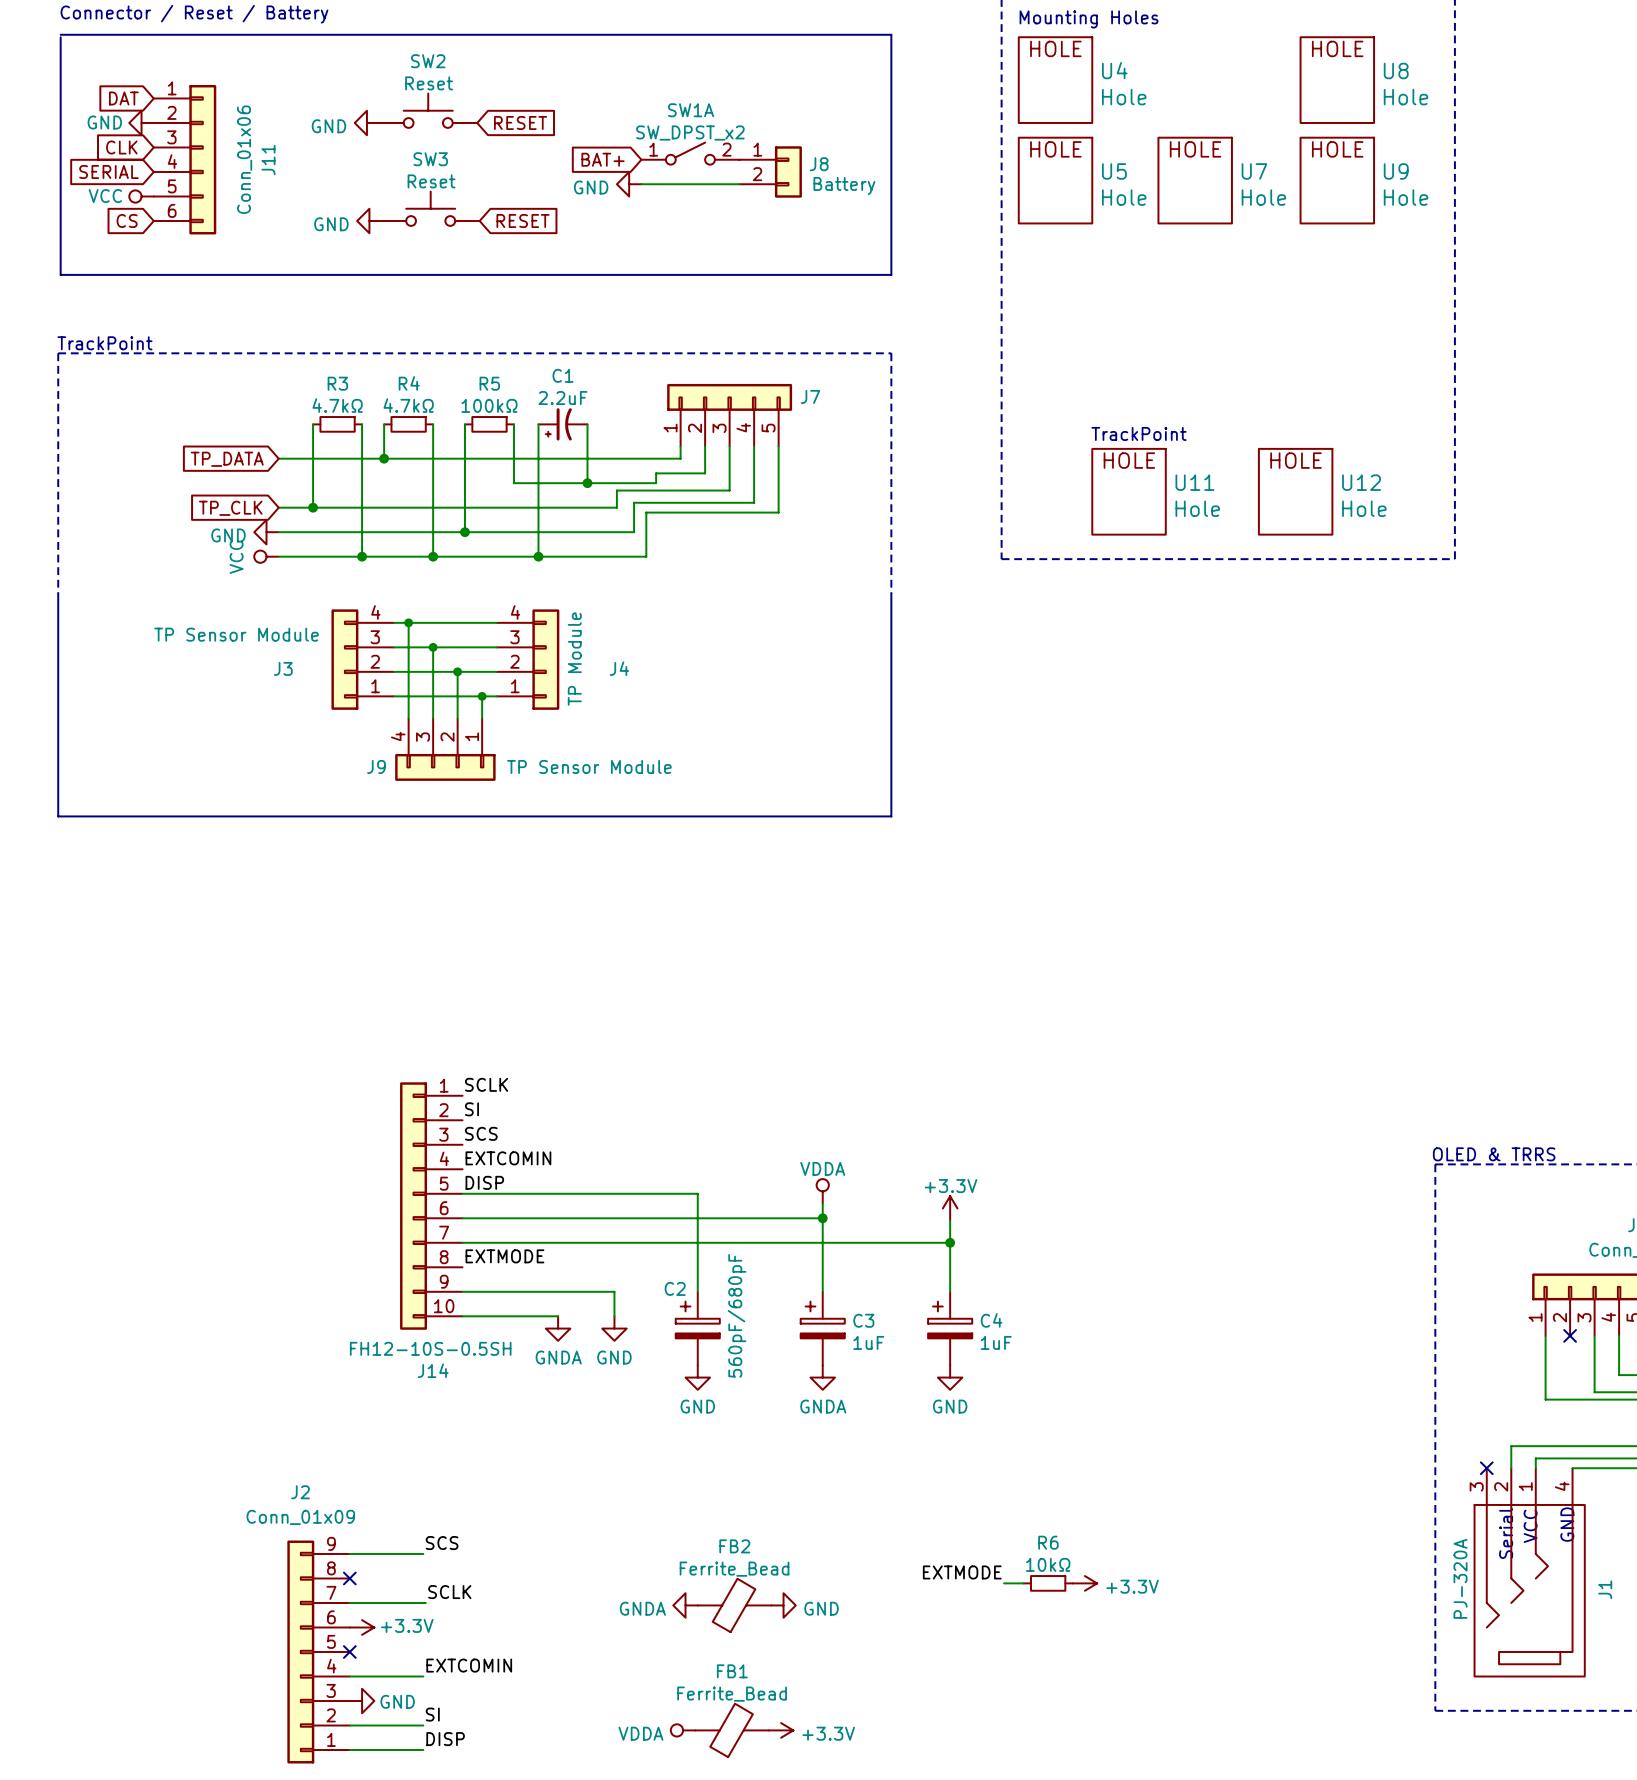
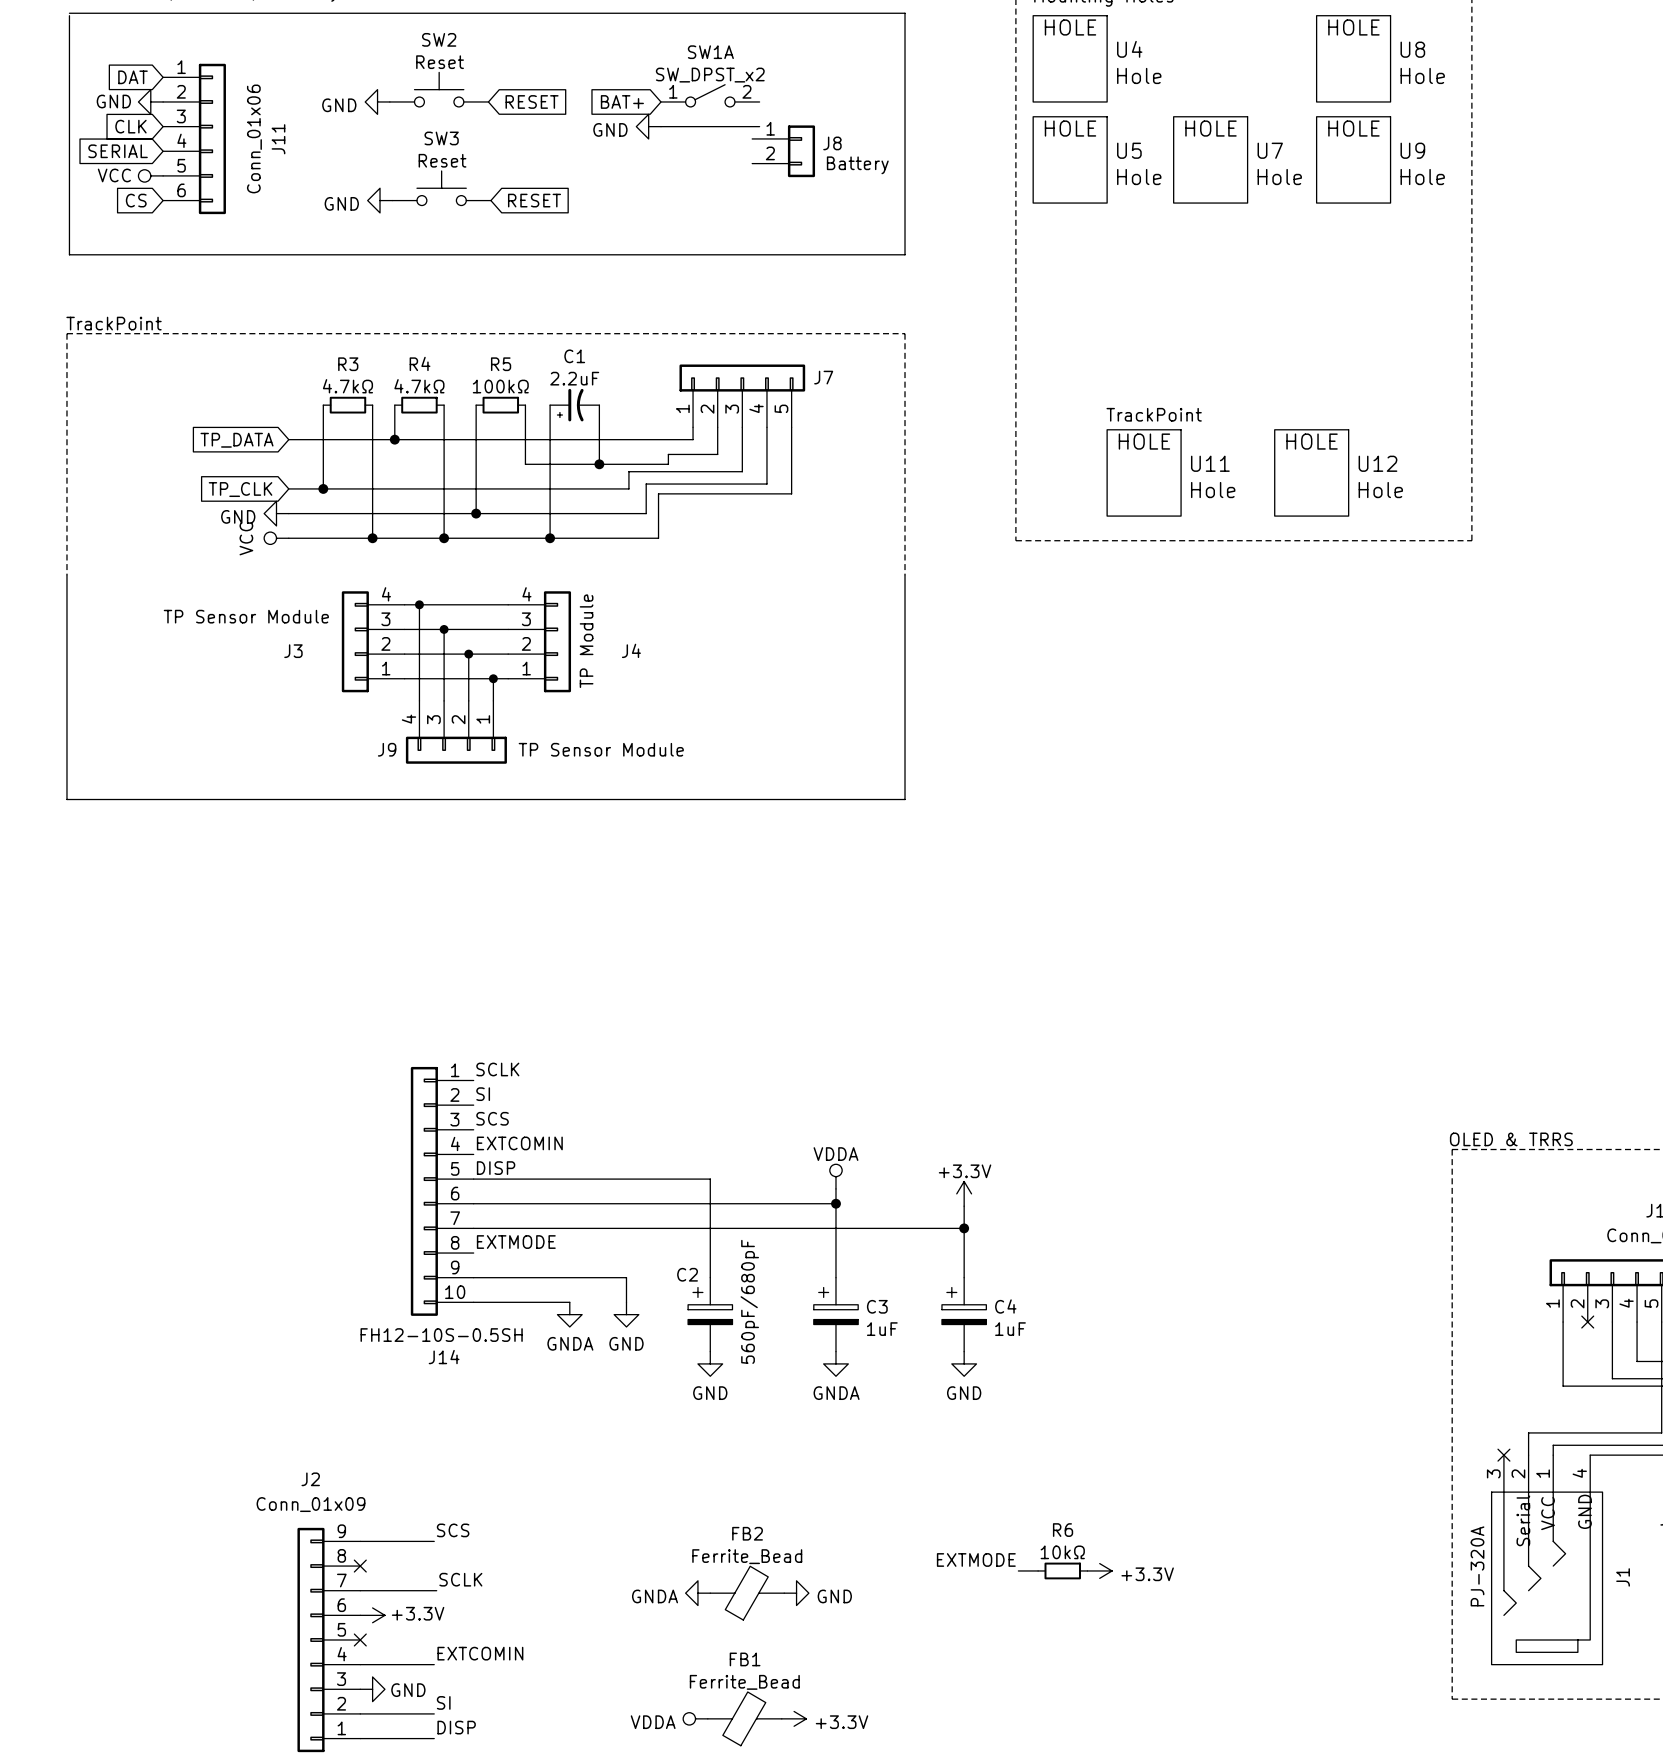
SW1A position: (690, 153) -> (710, 95)
global label position: BAT+ (603, 159) -> BAT+ (622, 101)
power symbol position: GND (629, 184) -> GND (648, 126)
wire: (641, 184) (739, 184) -> (660, 126) (759, 126)

